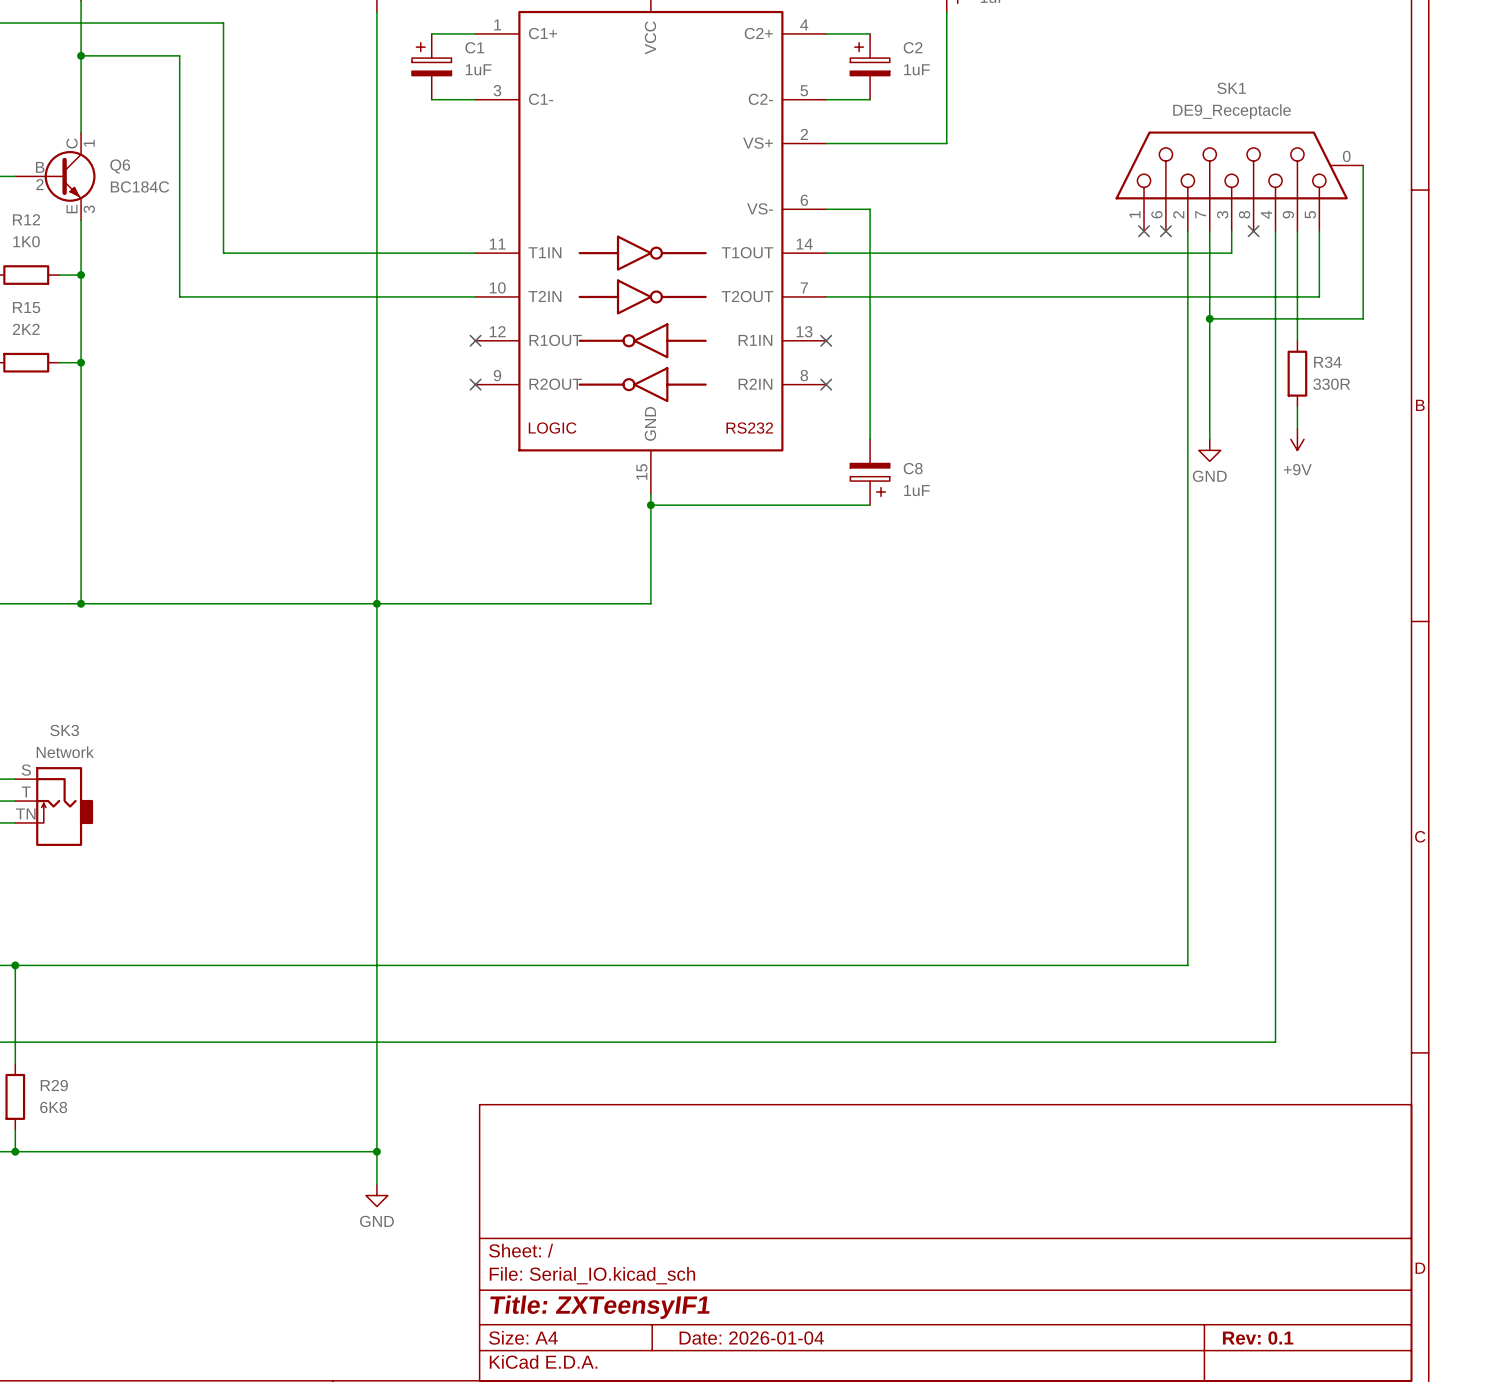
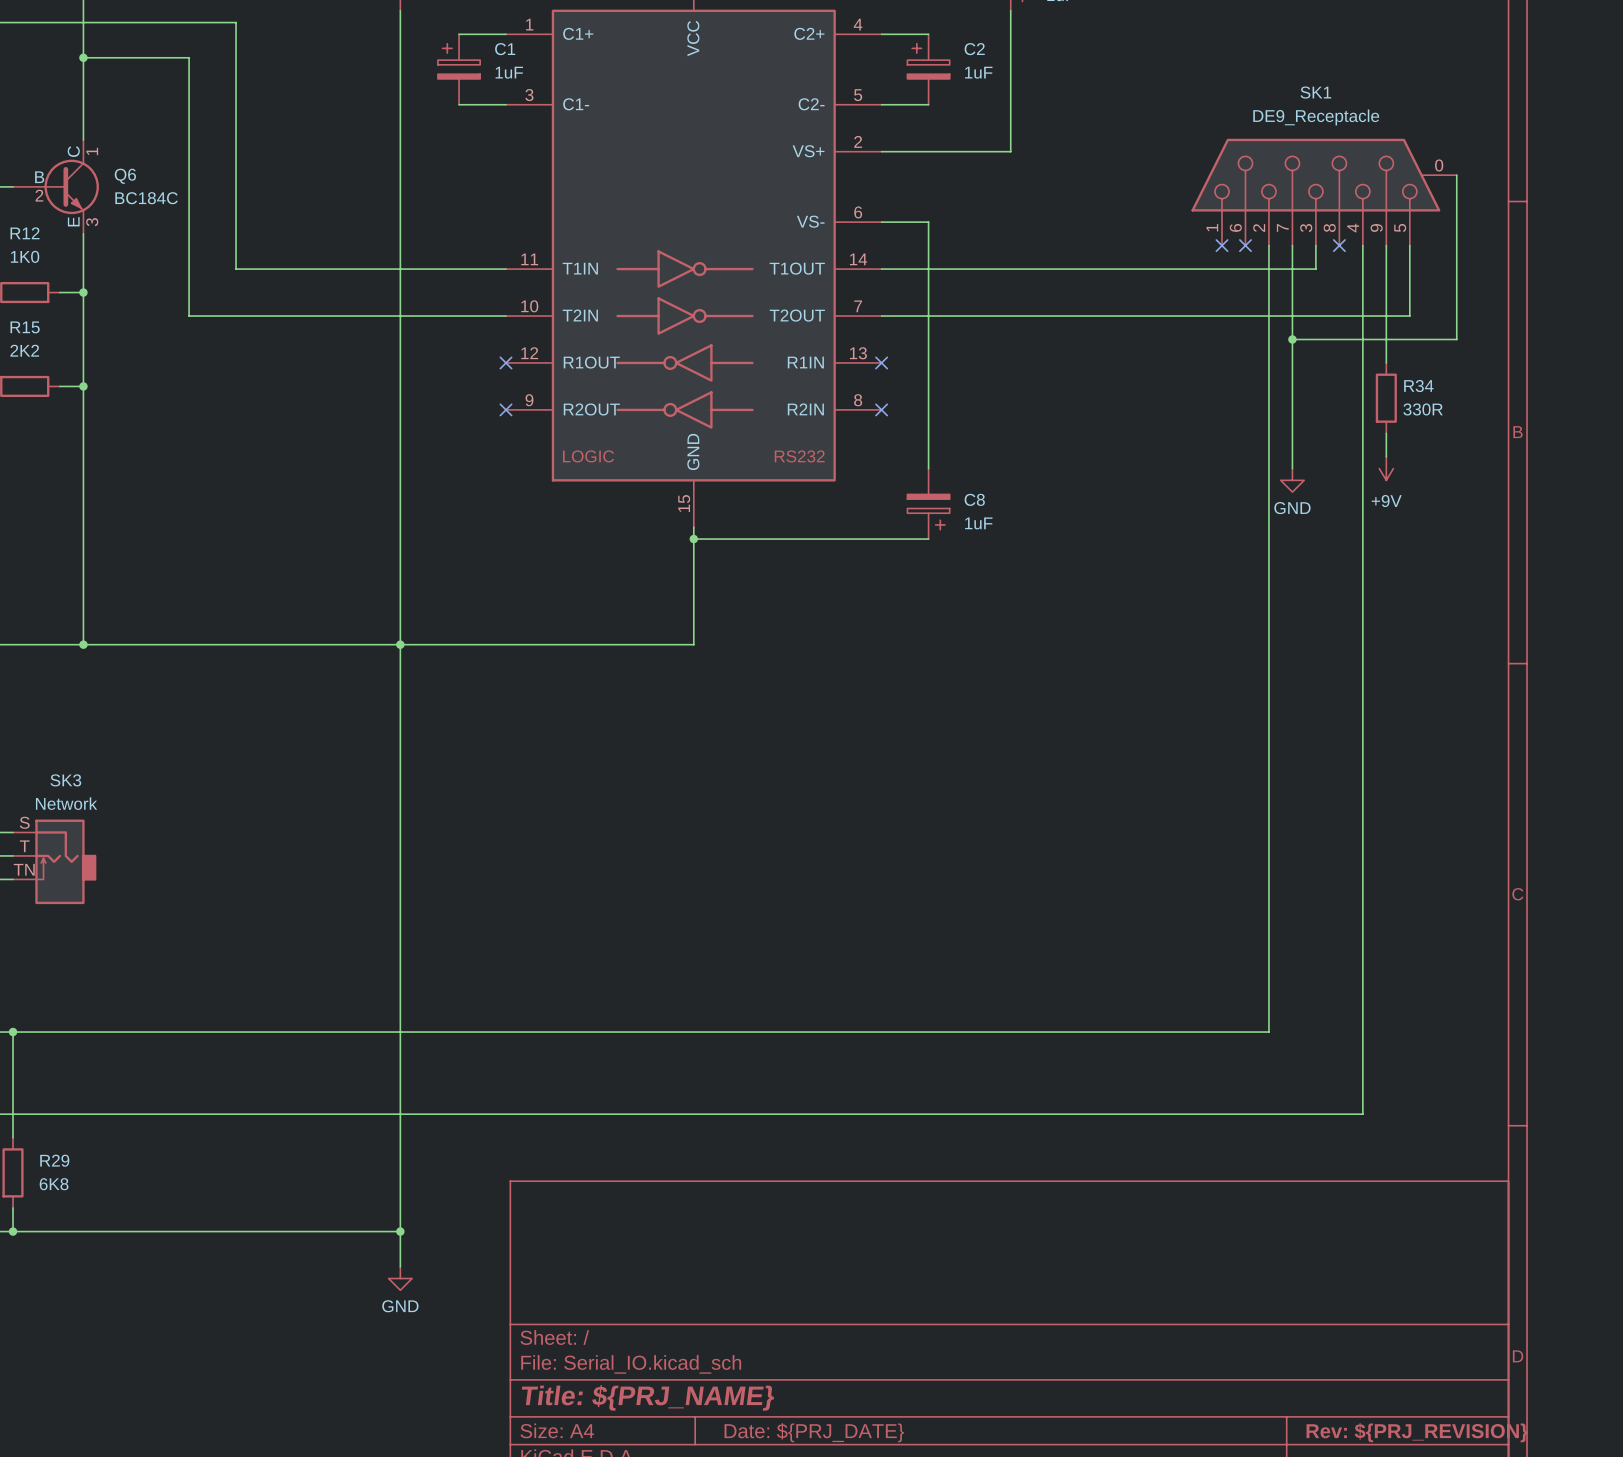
title block: Title: ZXTeensyIF1 (599, 1307) -> Title: ${PRJ_NAME} (647, 1397)
title block: Date: 2026-01-04 (751, 1338) -> Date: ${PRJ_DATE} (814, 1432)
title block: Rev: 0.1 (1258, 1338) -> Rev: ${PRJ_REVISION} (1417, 1432)

